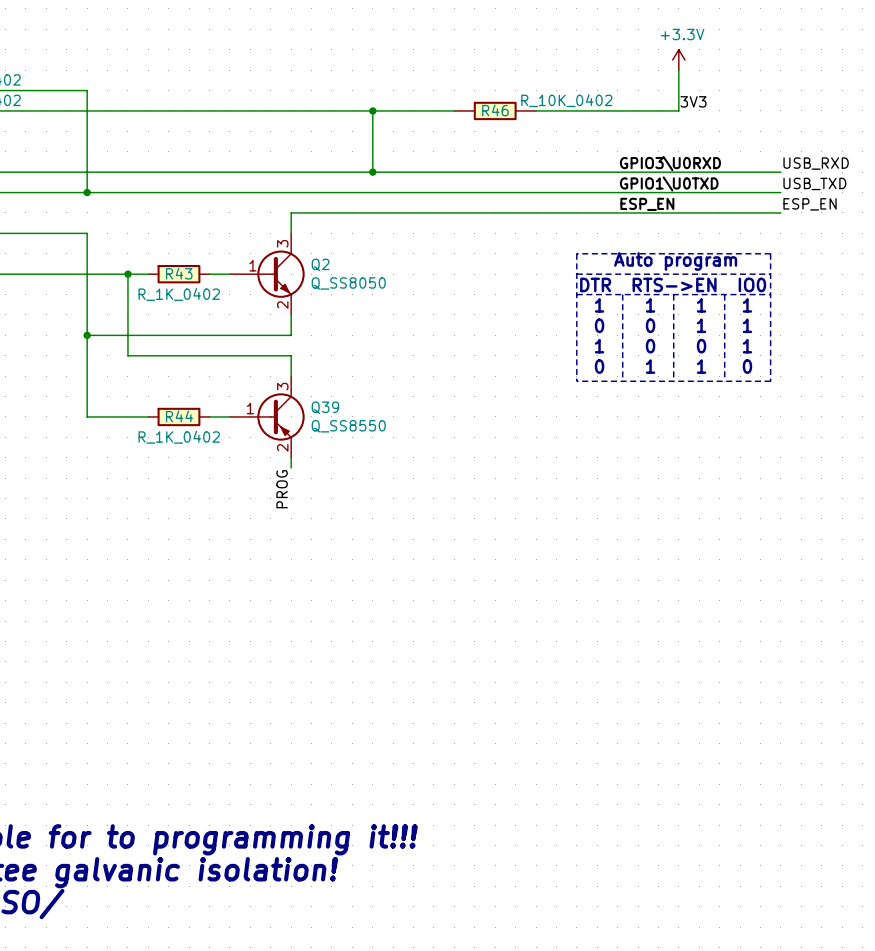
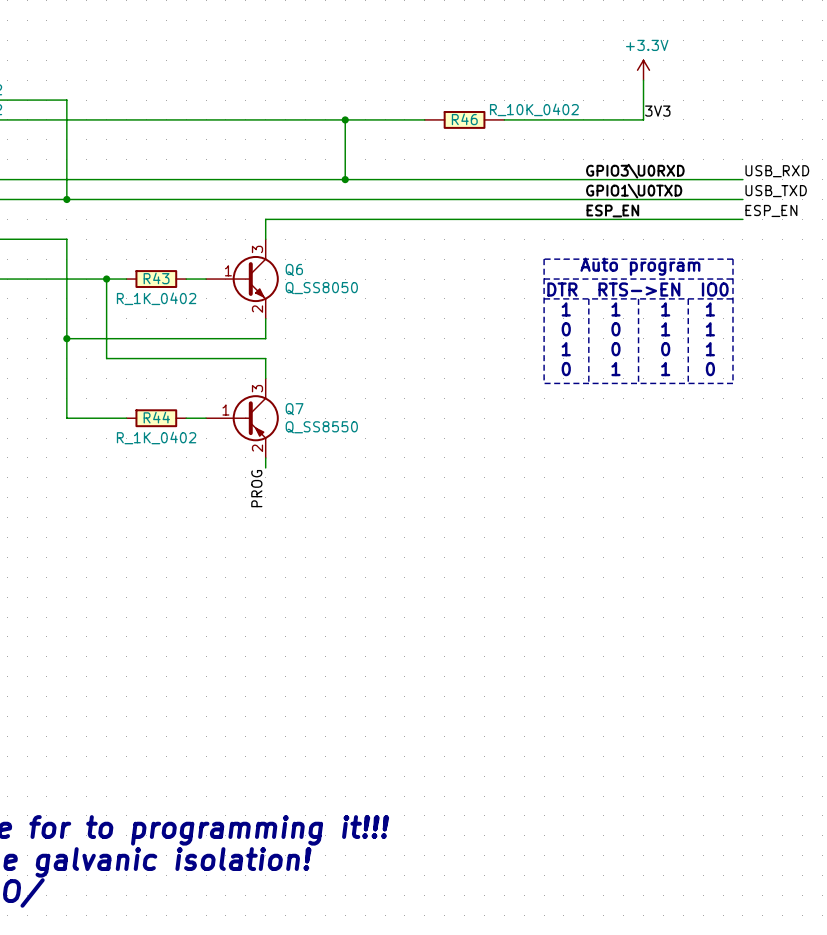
Q2 name: Q2 (320, 264) -> Q6 (294, 269)
Q39 name: Q39 (325, 407) -> Q7 (294, 409)

